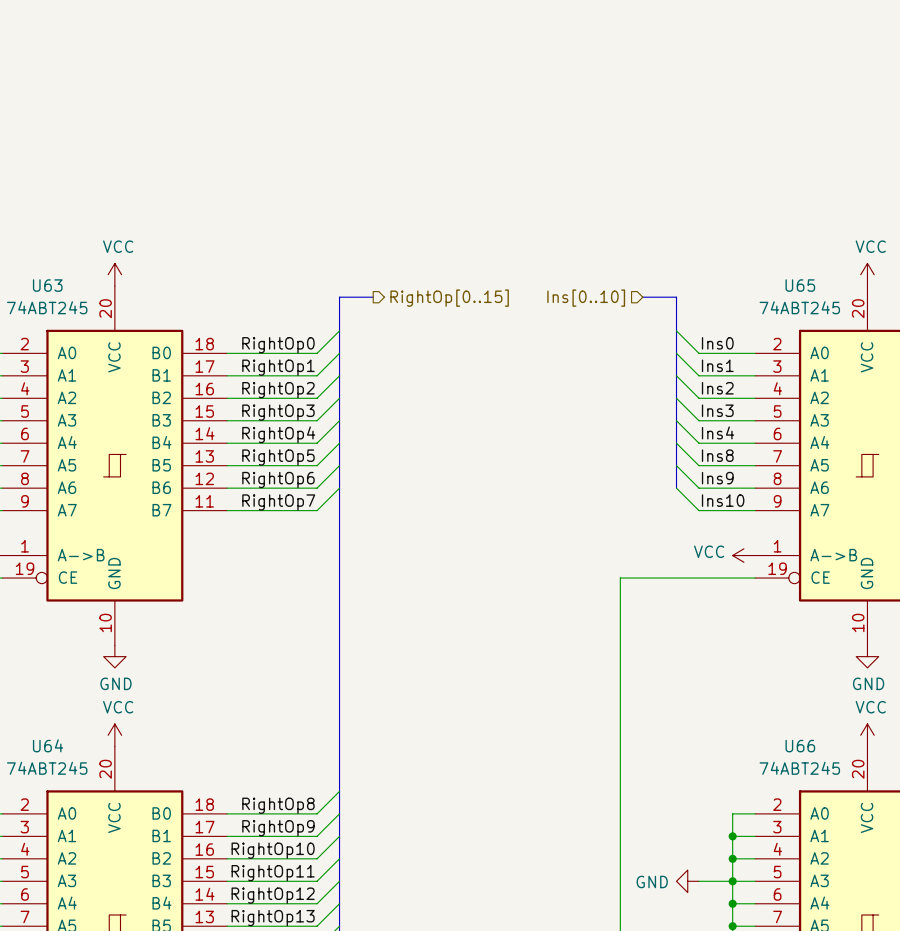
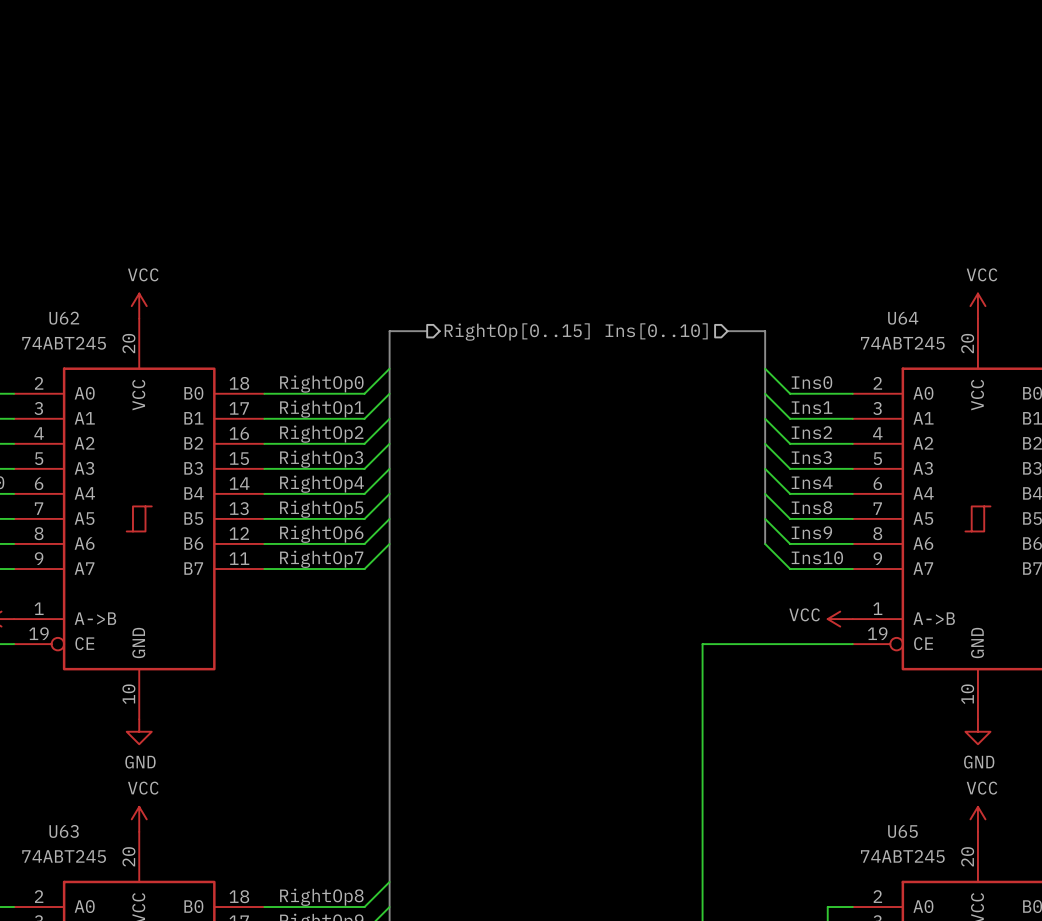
U63 name: U63 (47, 285) -> U62 (64, 318)
U65 name: U65 (800, 285) -> U64 (903, 318)
U64 name: U64 (48, 745) -> U63 (64, 831)
U66 name: U66 (800, 746) -> U65 (902, 831)

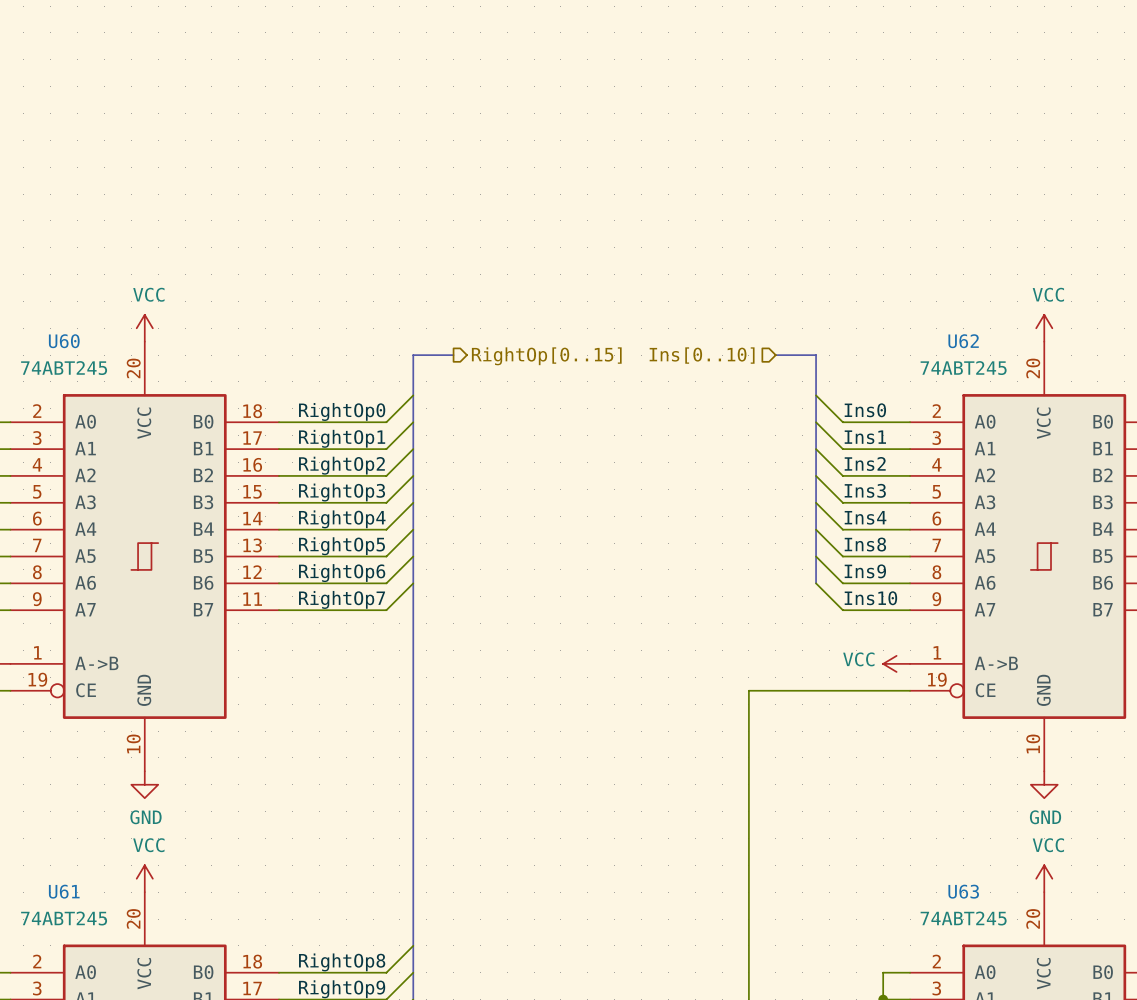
U62 name: U62 (64, 318) -> U60 (64, 341)
U64 name: U64 (903, 318) -> U62 (963, 341)
U63 name: U63 (64, 831) -> U61 (64, 891)
U65 name: U65 (902, 831) -> U63 (963, 891)

